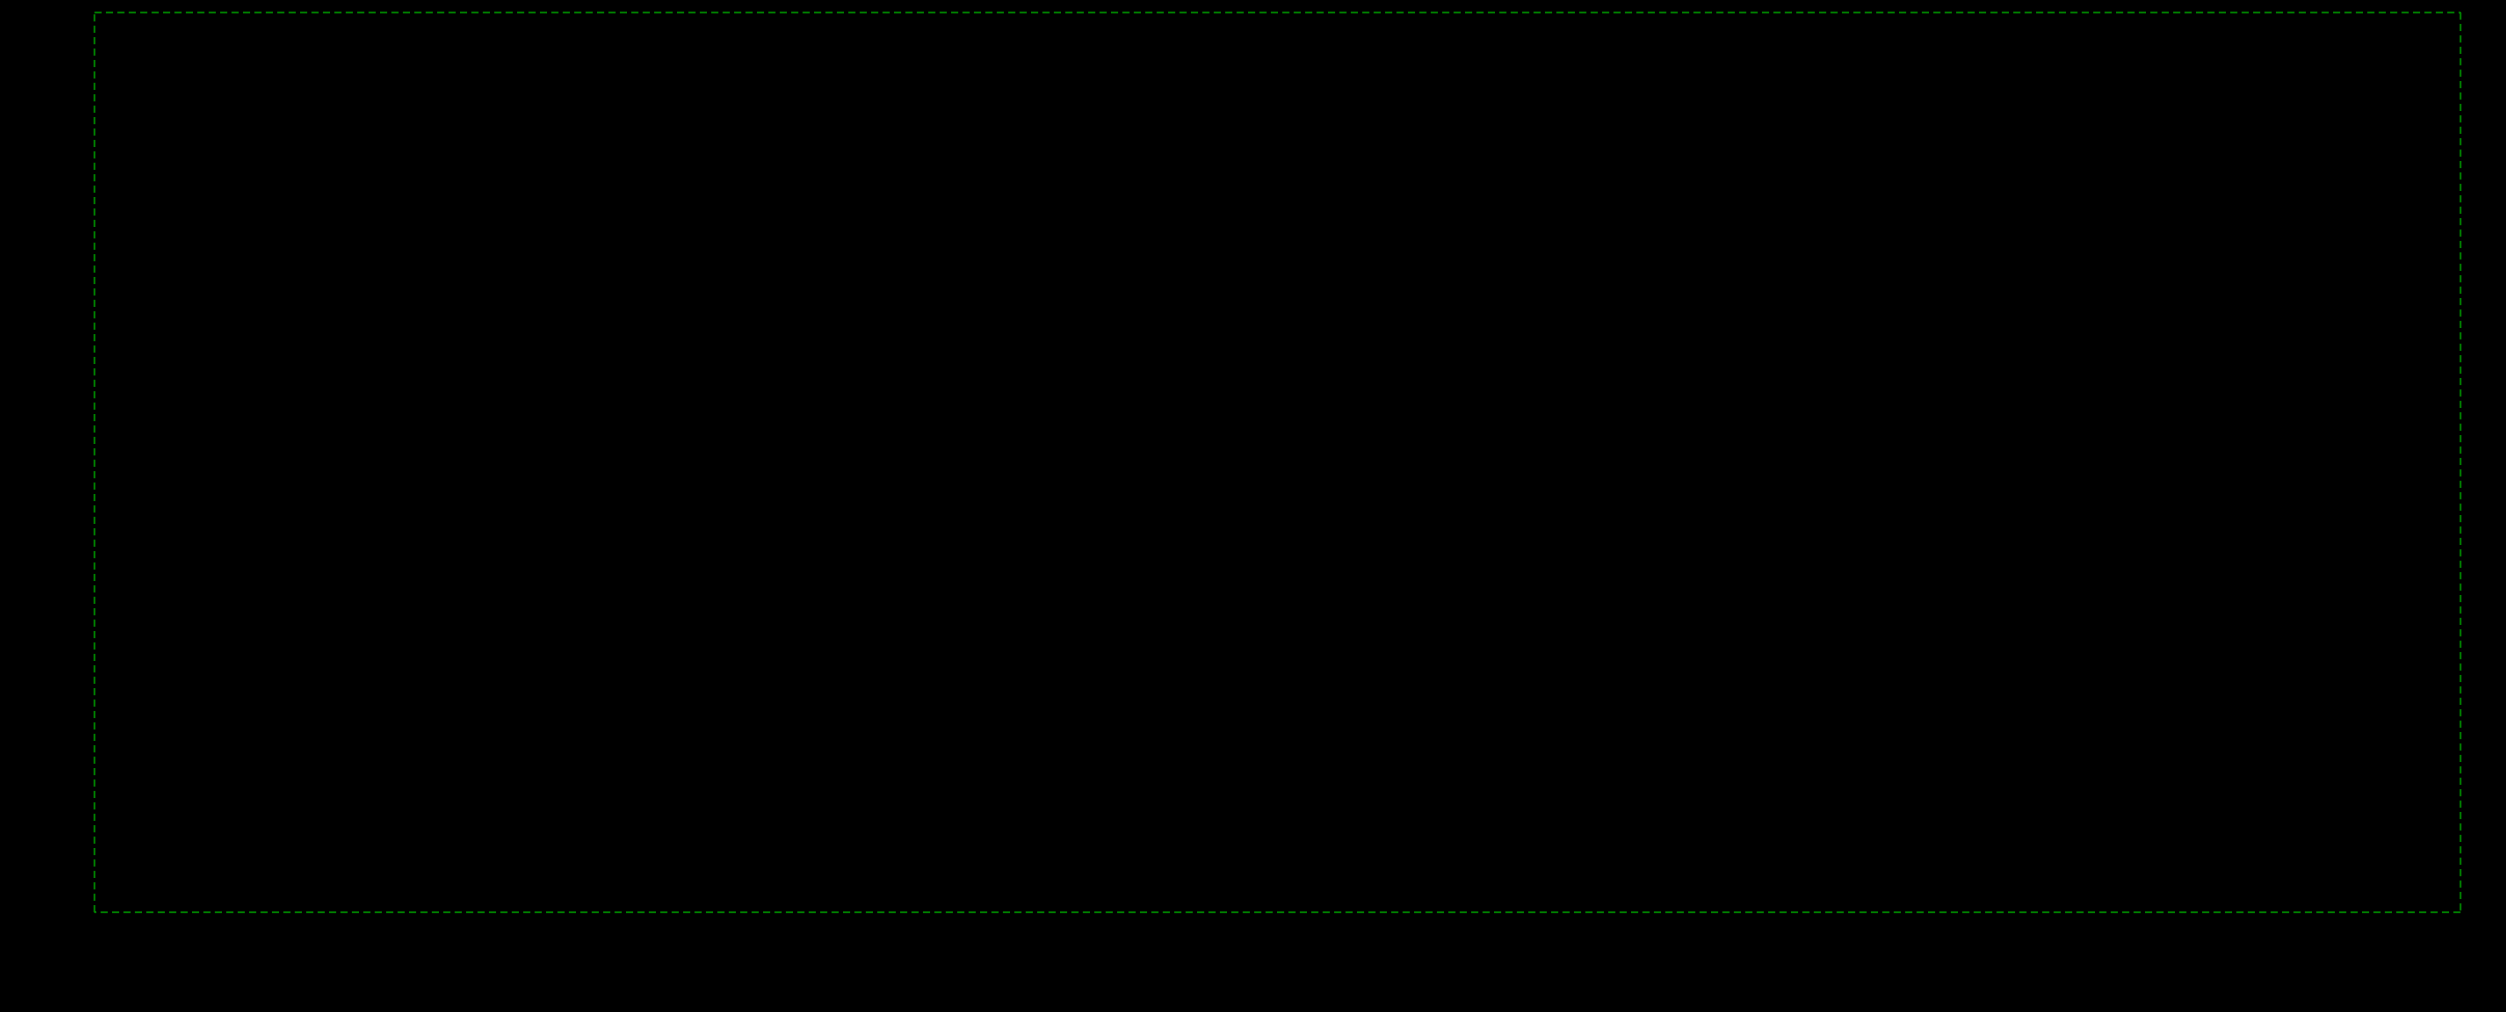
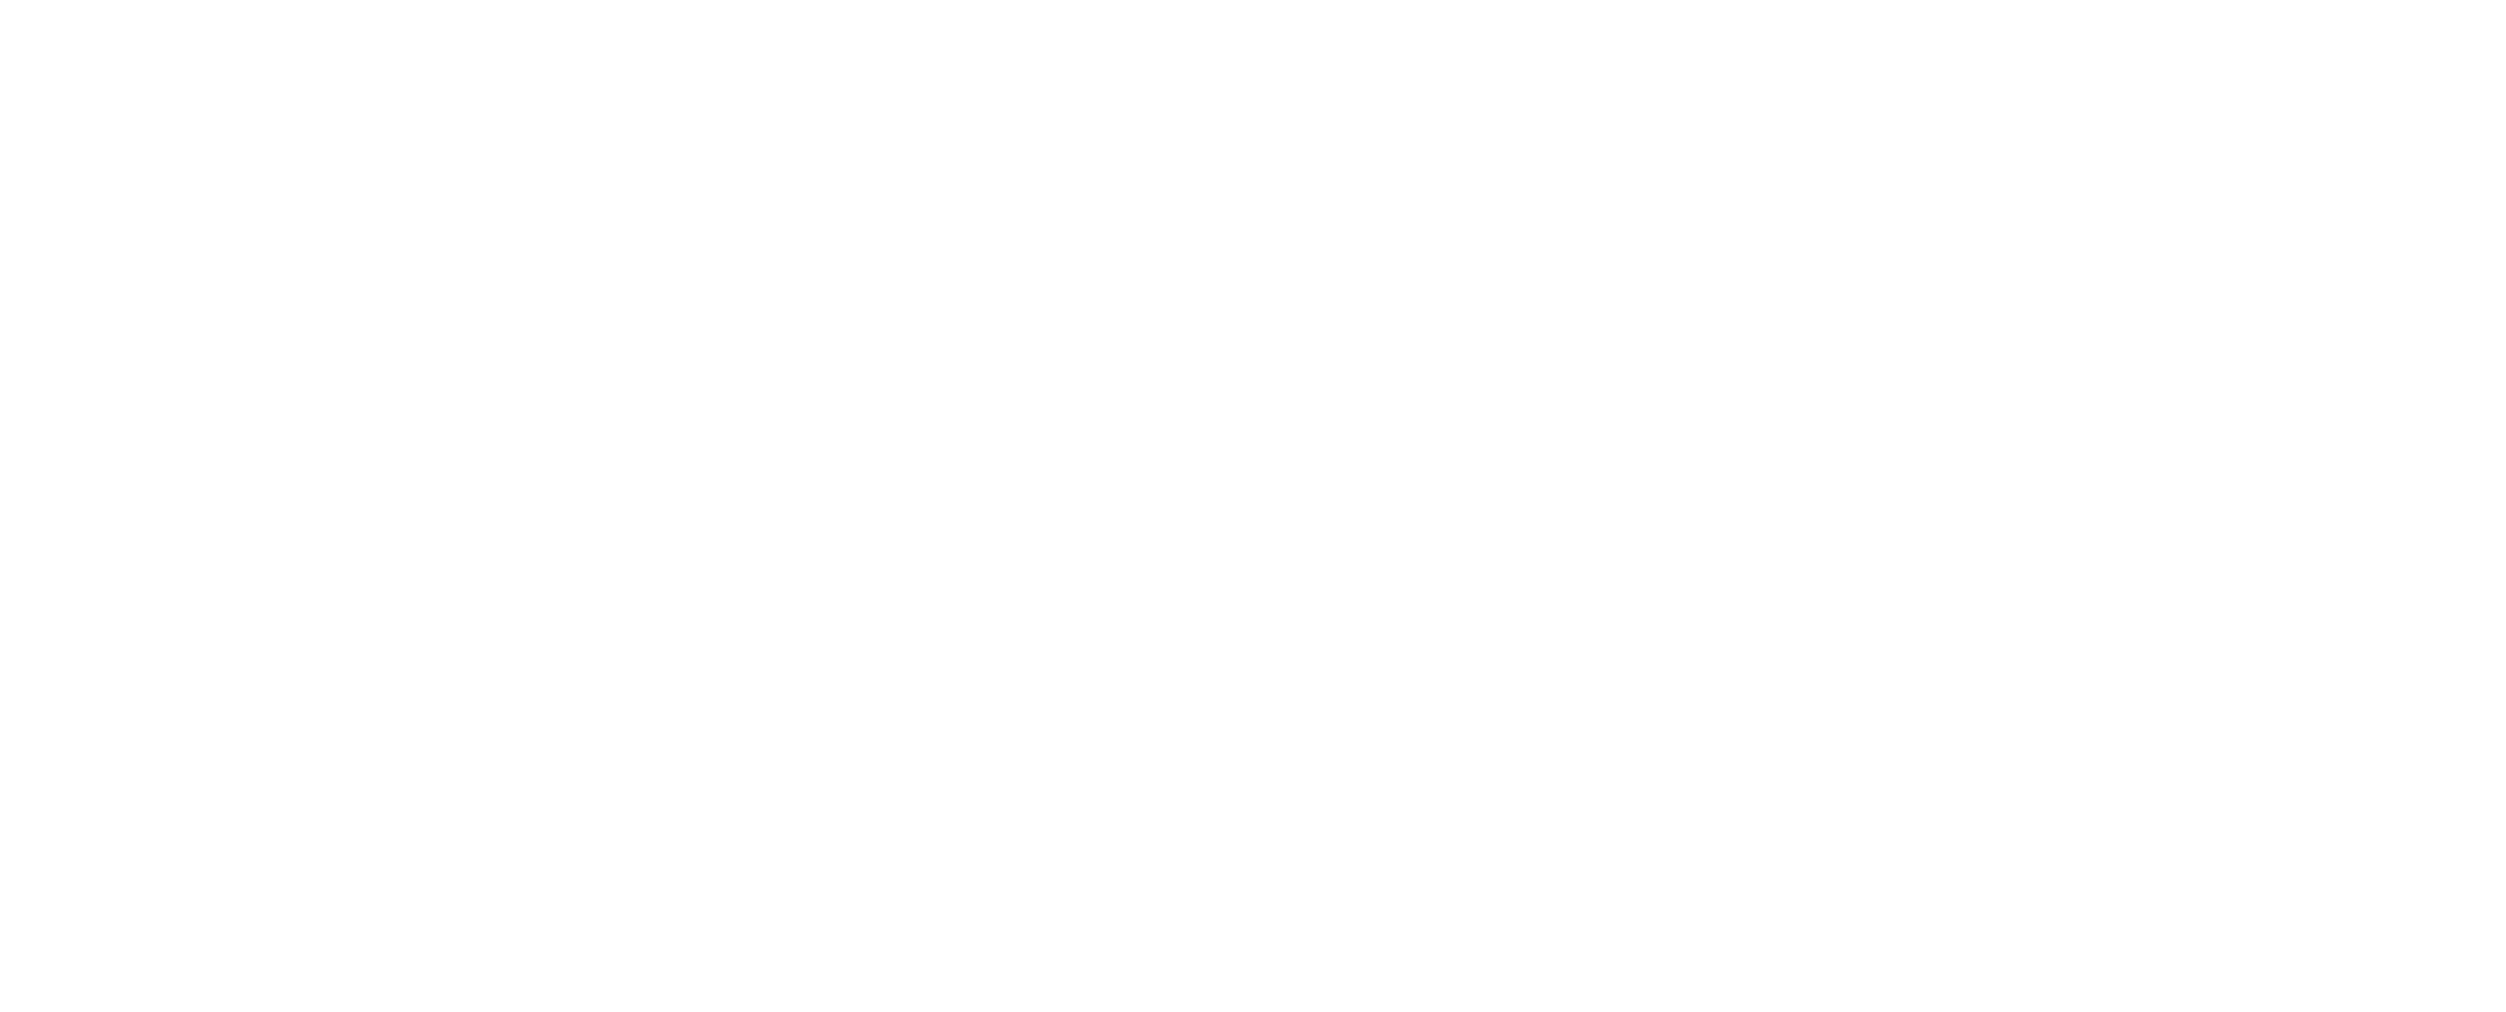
zone outline: (2460, 12) (94, 12) (94, 912) (2460, 912) (2460, 12) -> none

